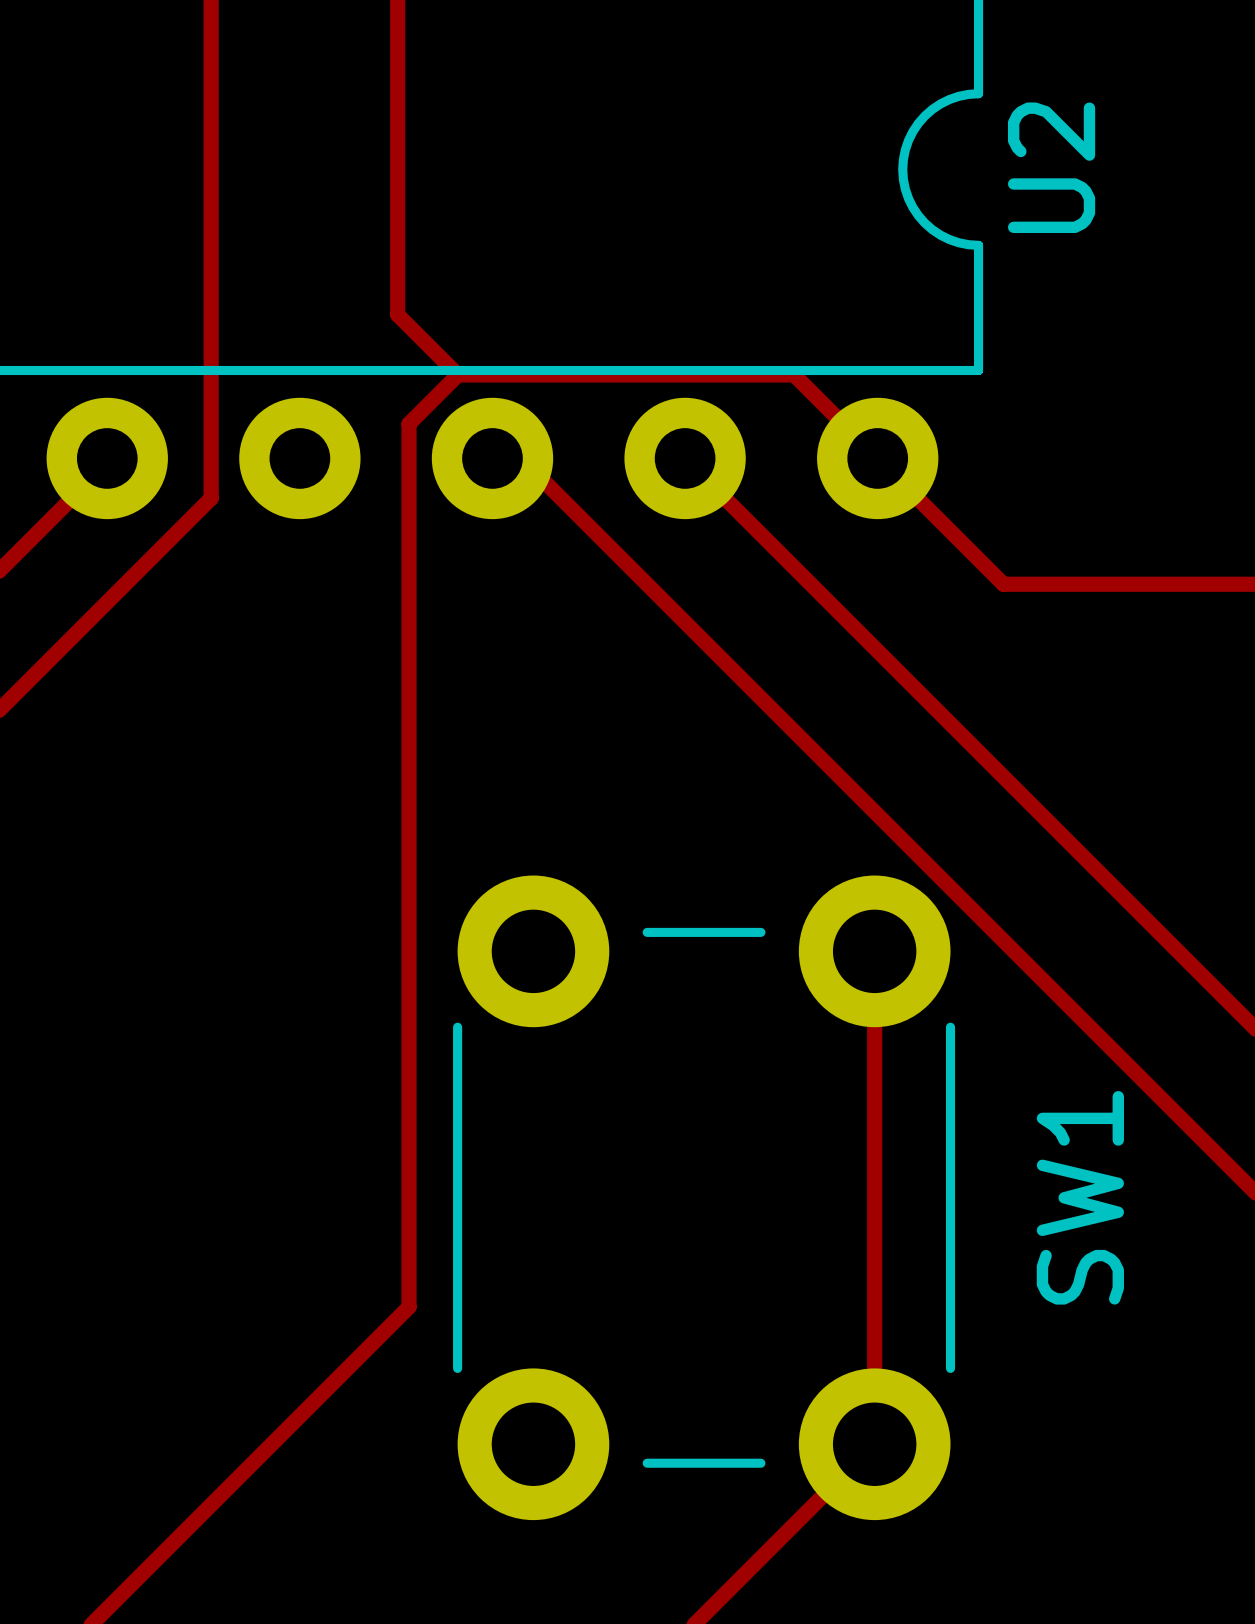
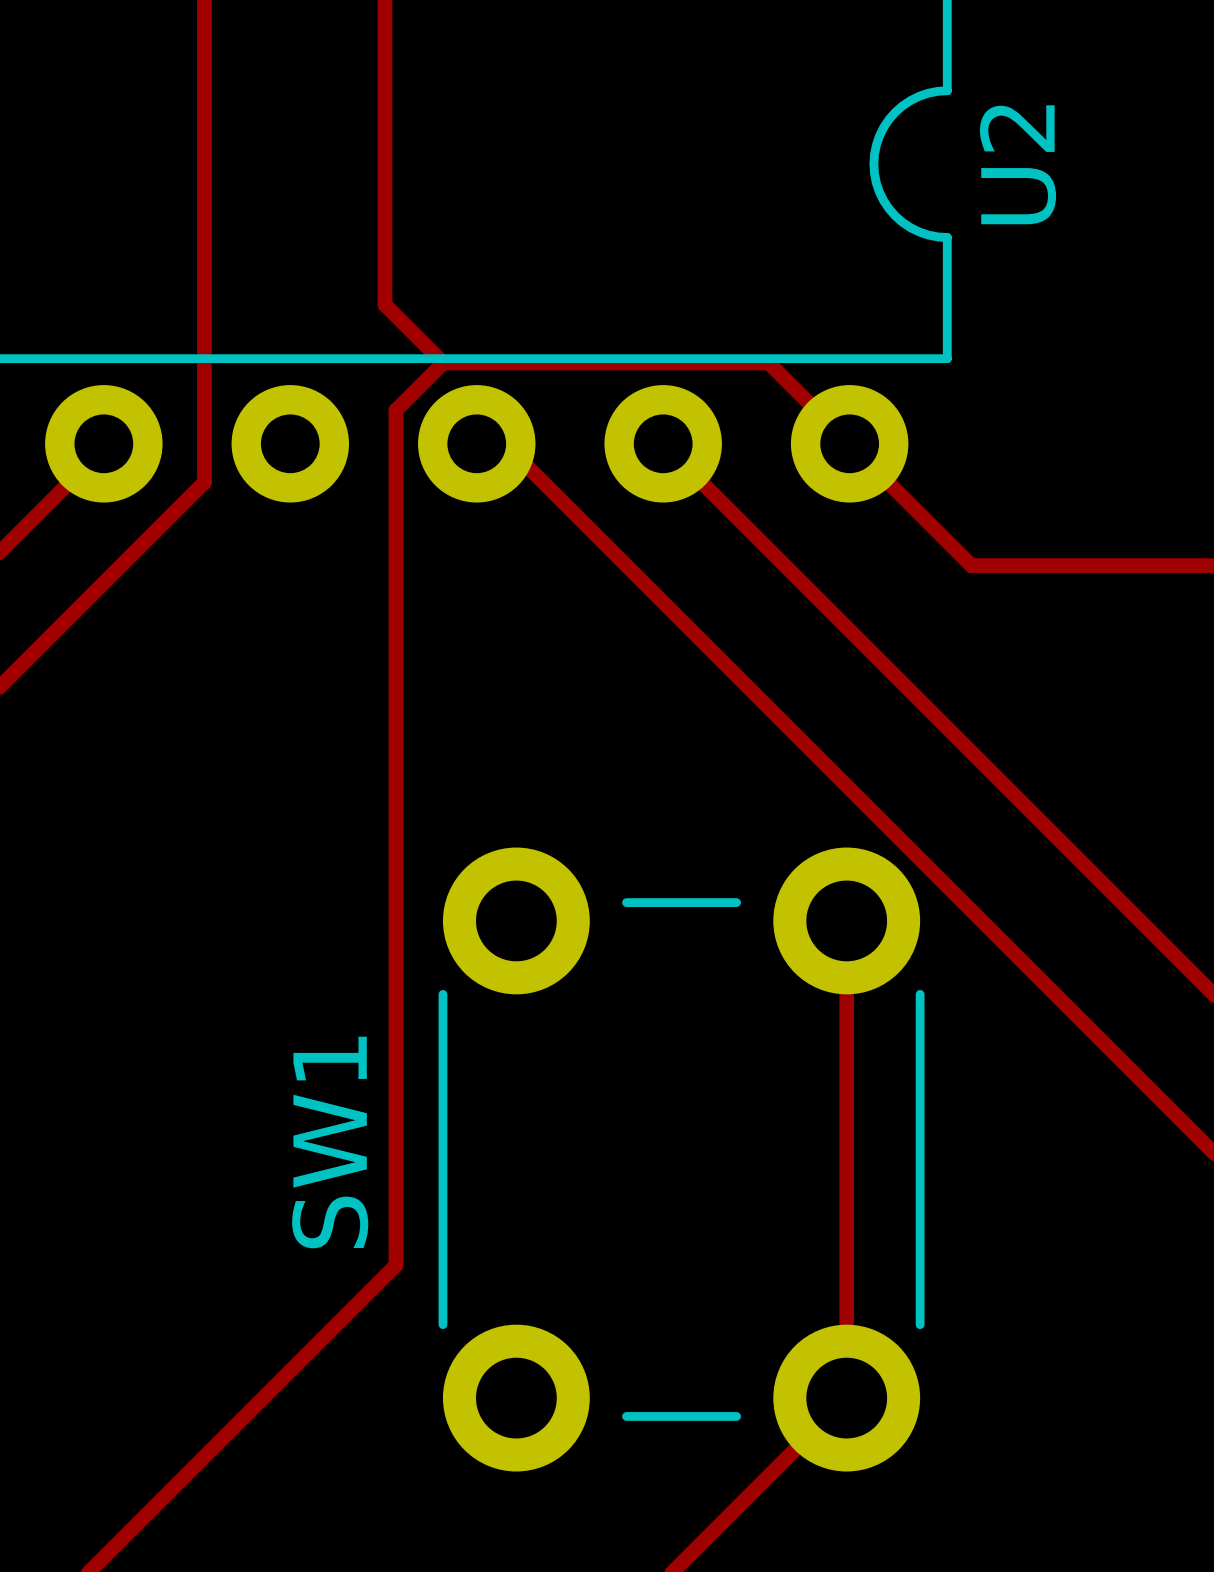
SW1 name position: SW1 (1080, 1197) -> SW1 (330, 1142)

